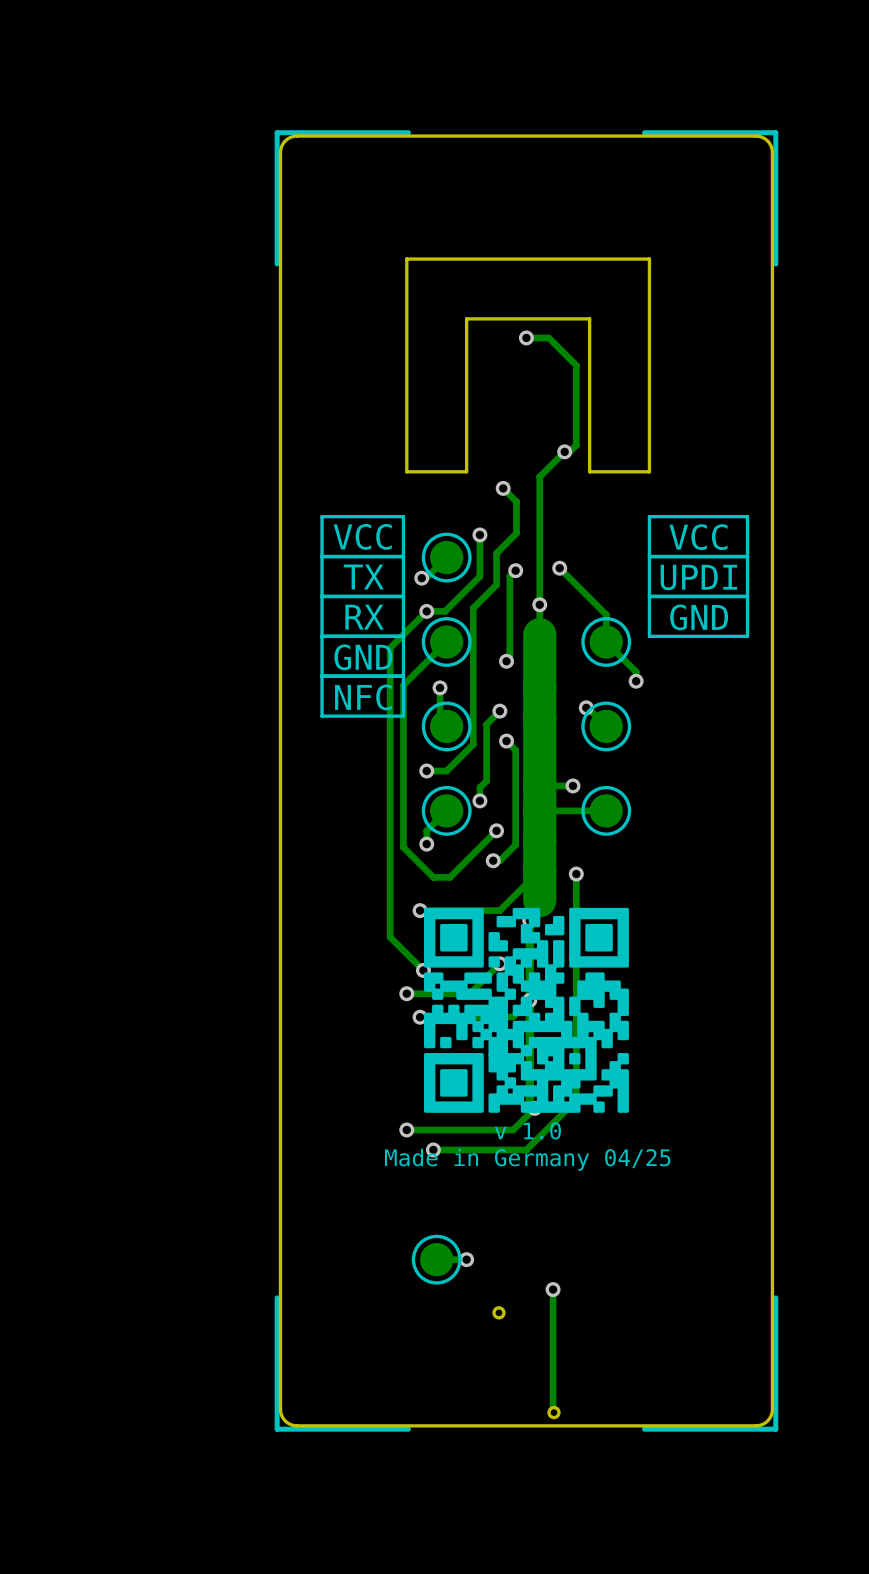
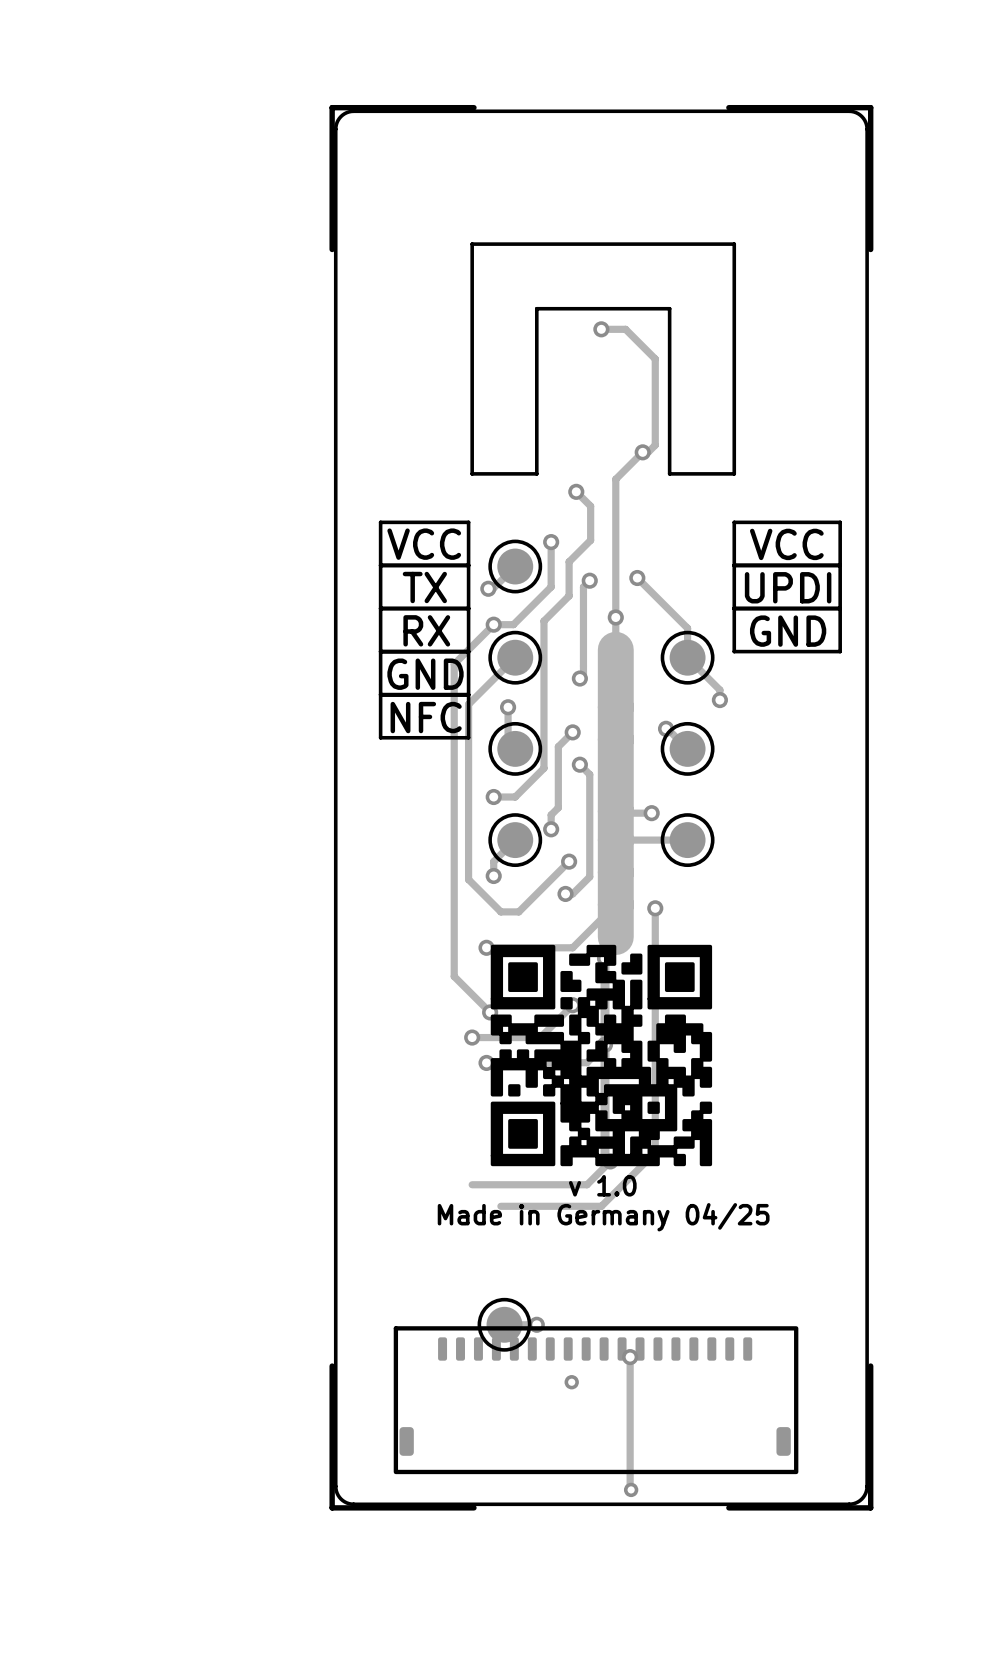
via: (406, 1130) -> none
via: (433, 1149) -> none
part: none -> (596, 1400)

